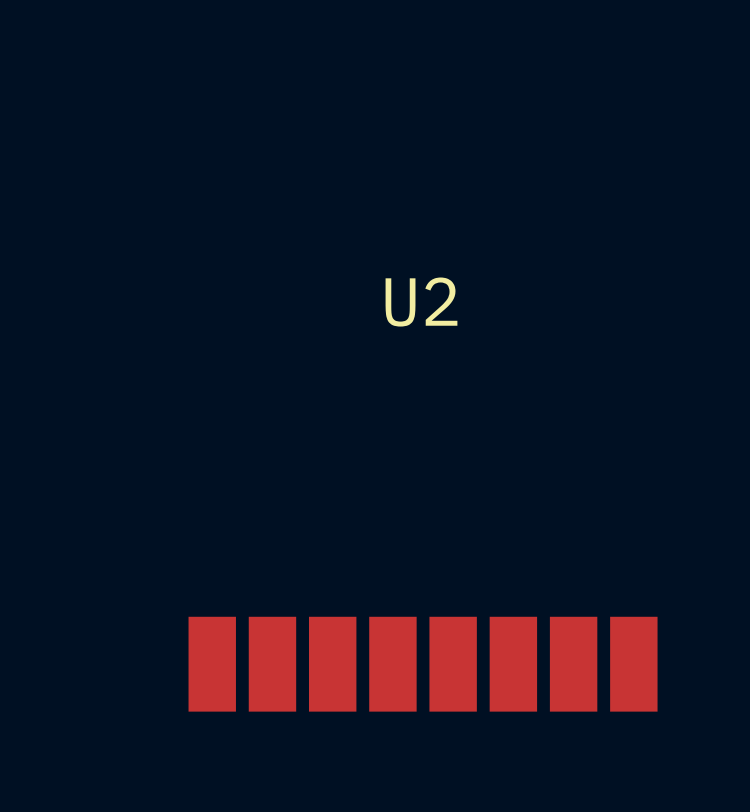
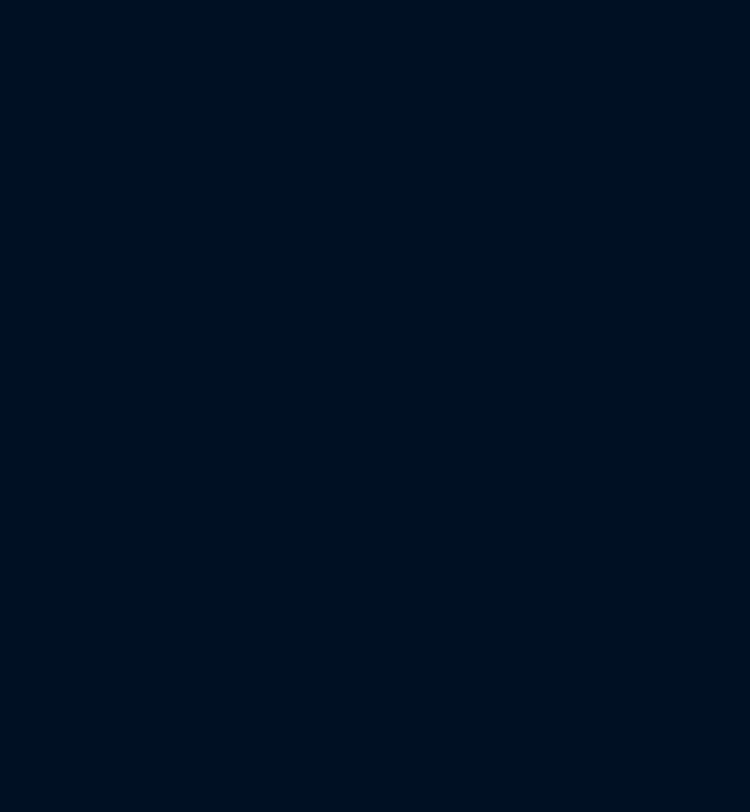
U2: (423, 664) -> none

